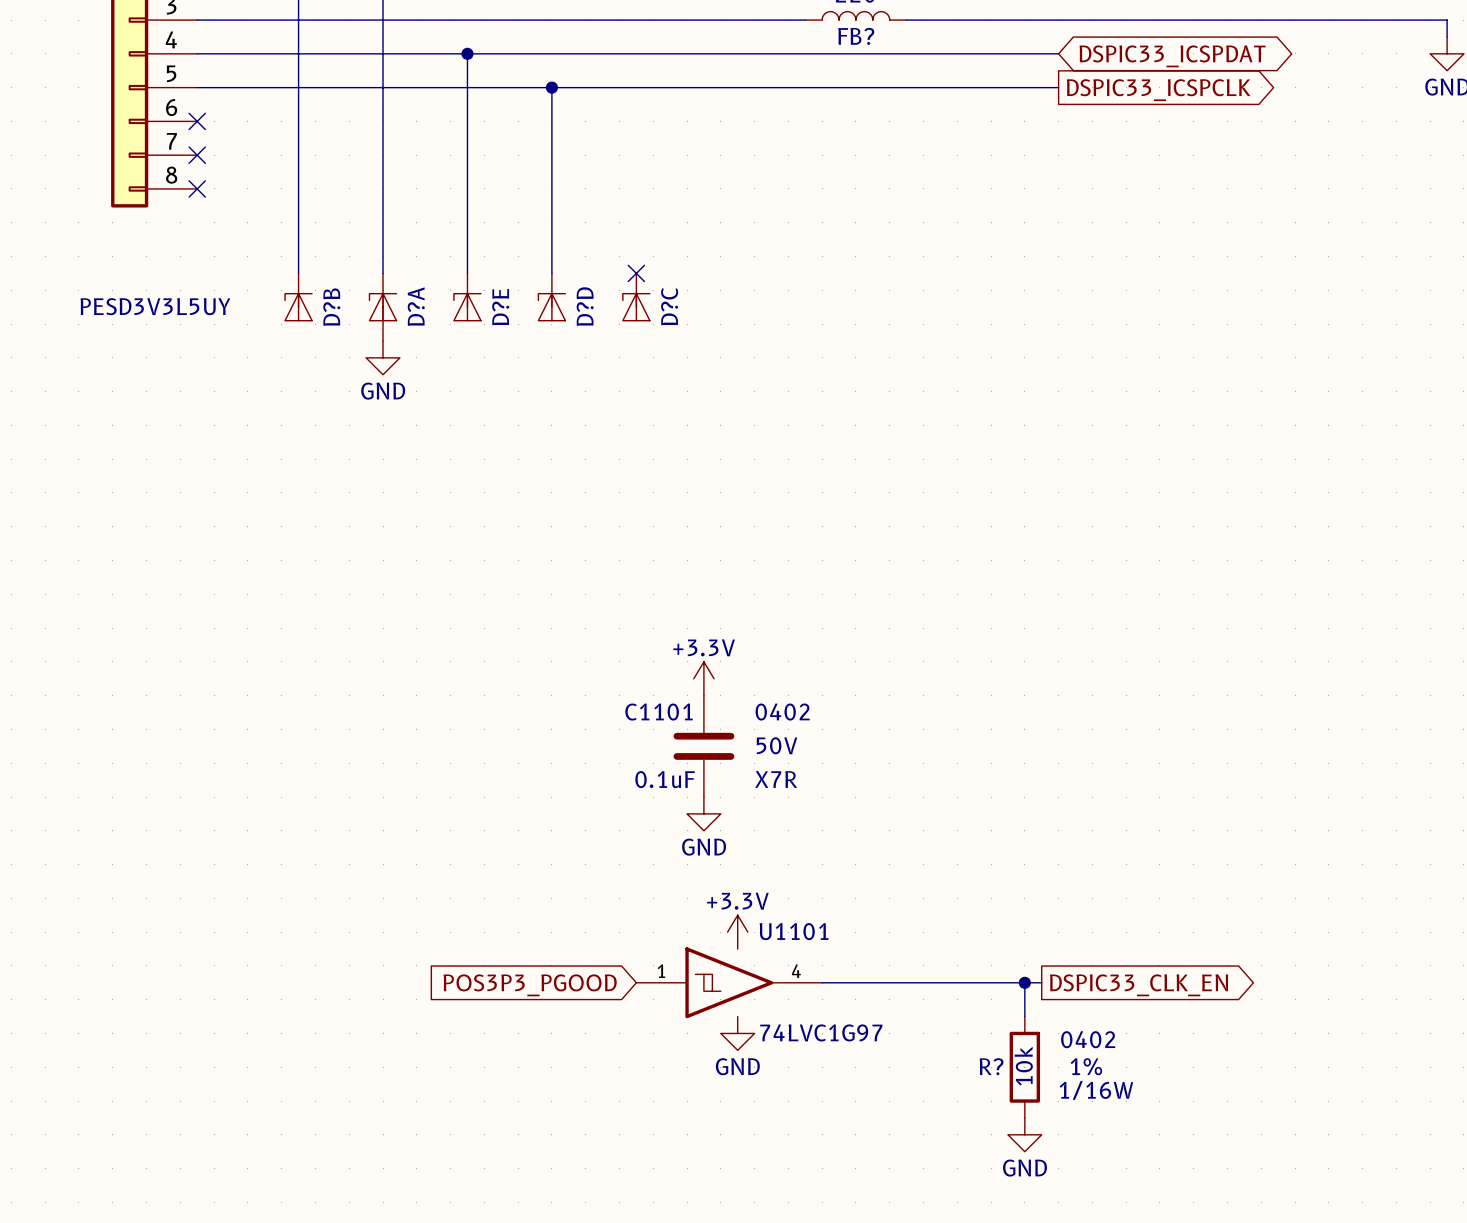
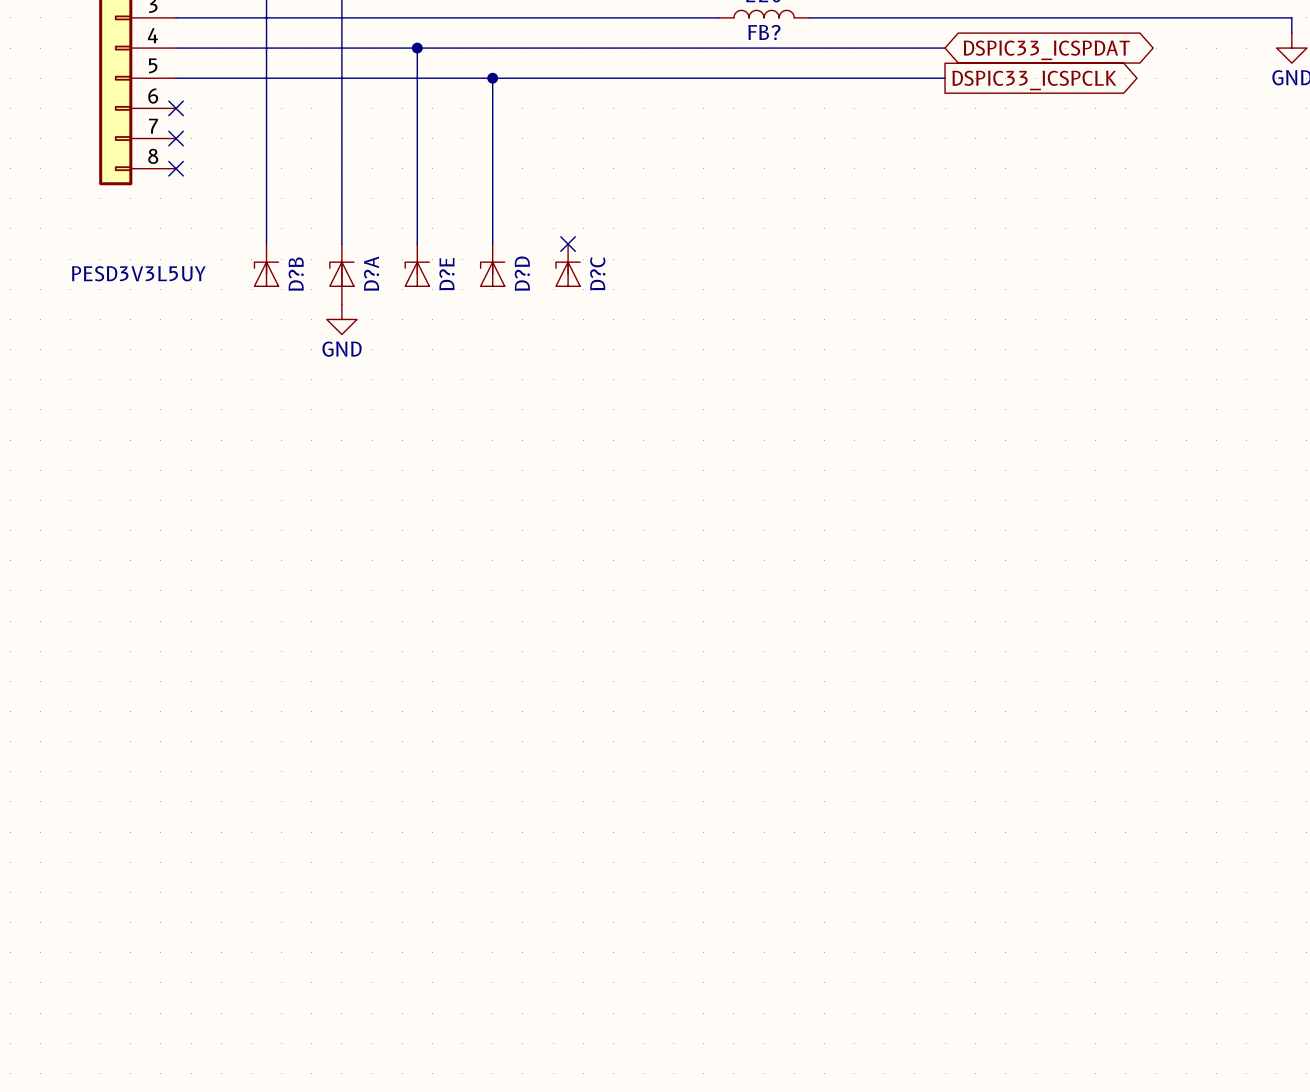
power symbol: +3.3V (703, 678) -> none
C1101: 0.1uF (703, 746) -> none
power symbol: GND (703, 813) -> none
power symbol: +3.3V (737, 932) -> none
U1101: 74LVC1G97 (729, 982) -> none
wire: (822, 982) (1041, 982) -> none
wire: (1024, 982) (1024, 1016) -> none
junction: (1024, 982) -> none
global label: POS3P3_PGOOD (530, 985) -> none
global label: DSPIC33_CLK_EN (1138, 985) -> none
power symbol: GND (737, 1033) -> none
R?: 10k (1024, 1067) -> none
power symbol: GND (1024, 1134) -> none

